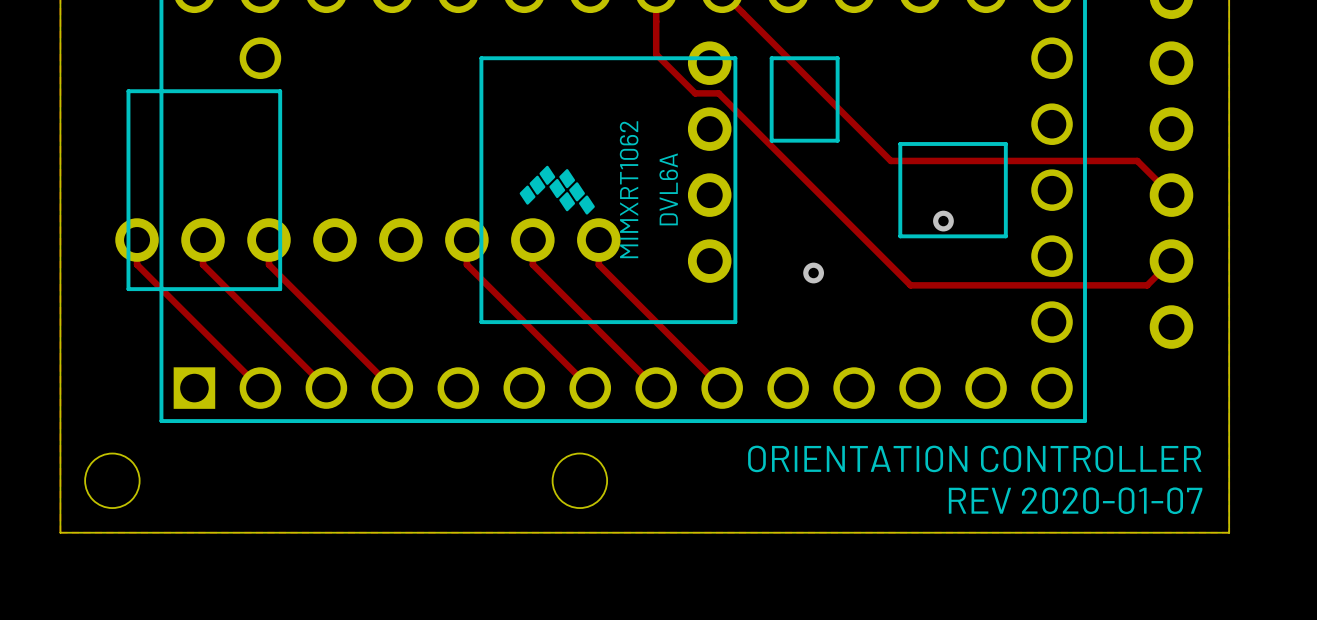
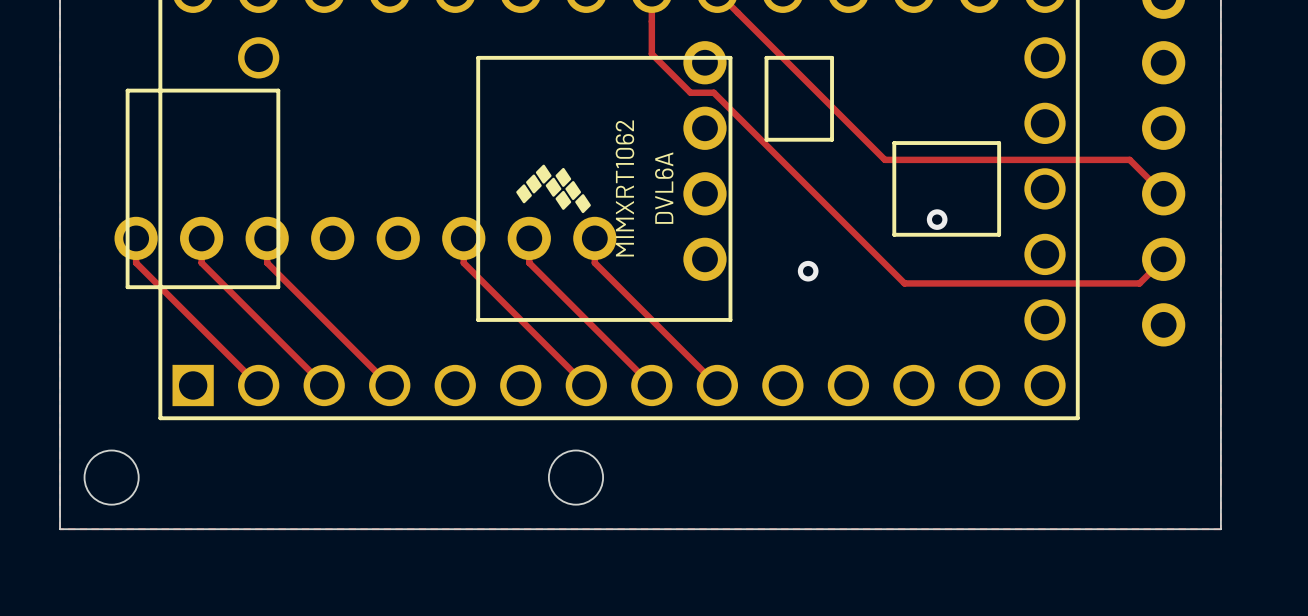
text: ORIENTATION CONTROLLER (974, 458) -> none
text: REV 2020-01-07 (1075, 500) -> none

